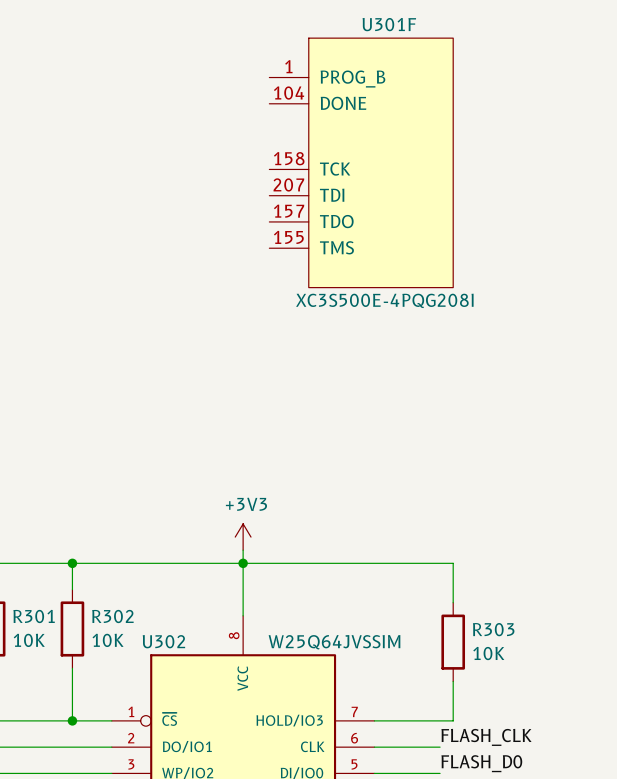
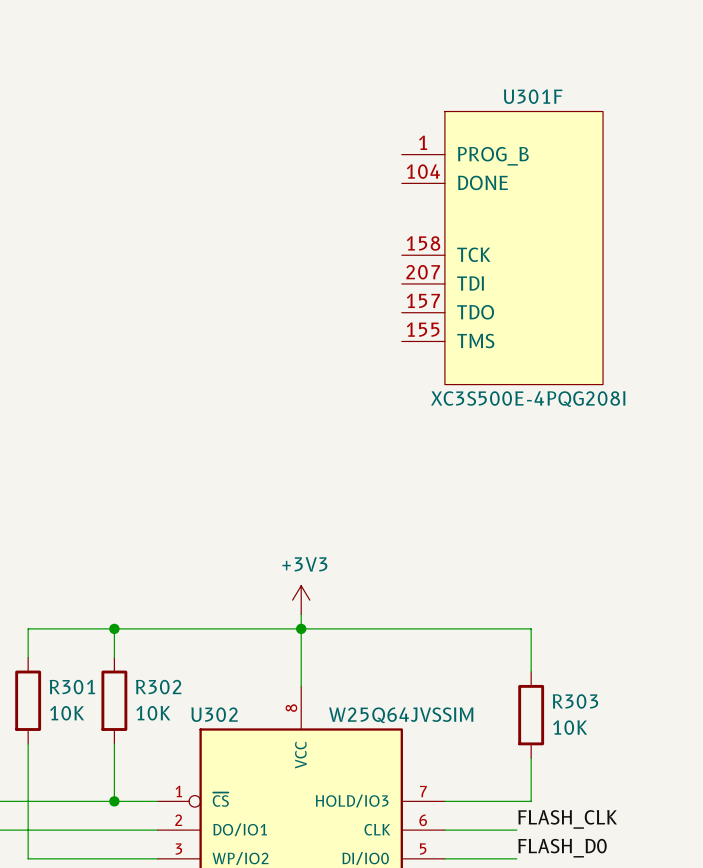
U301F position: (361, 162) -> (502, 248)

